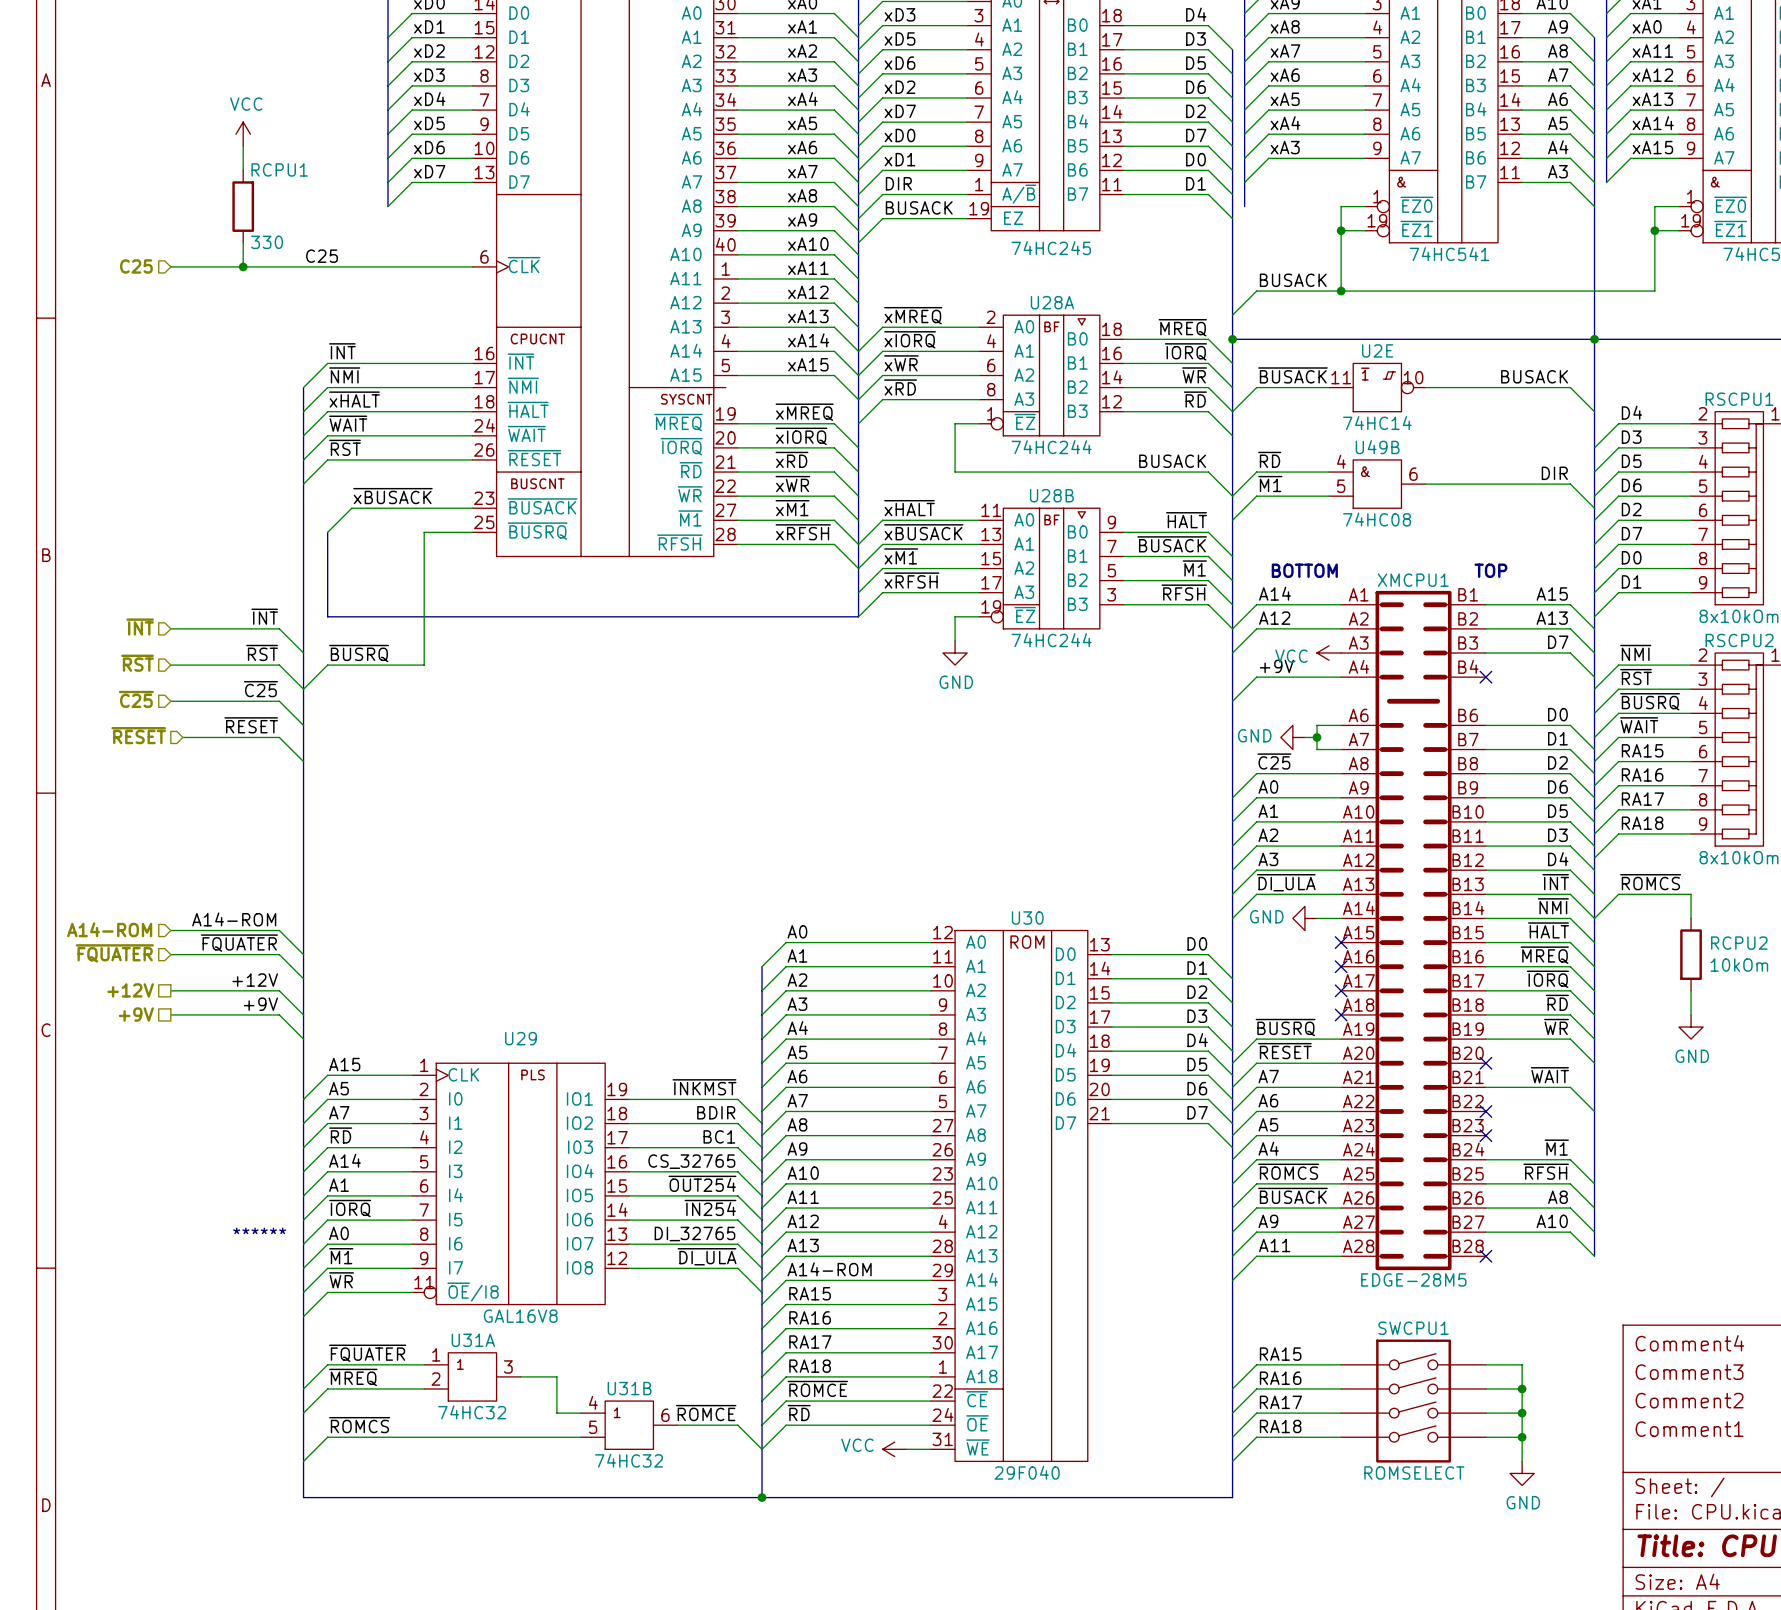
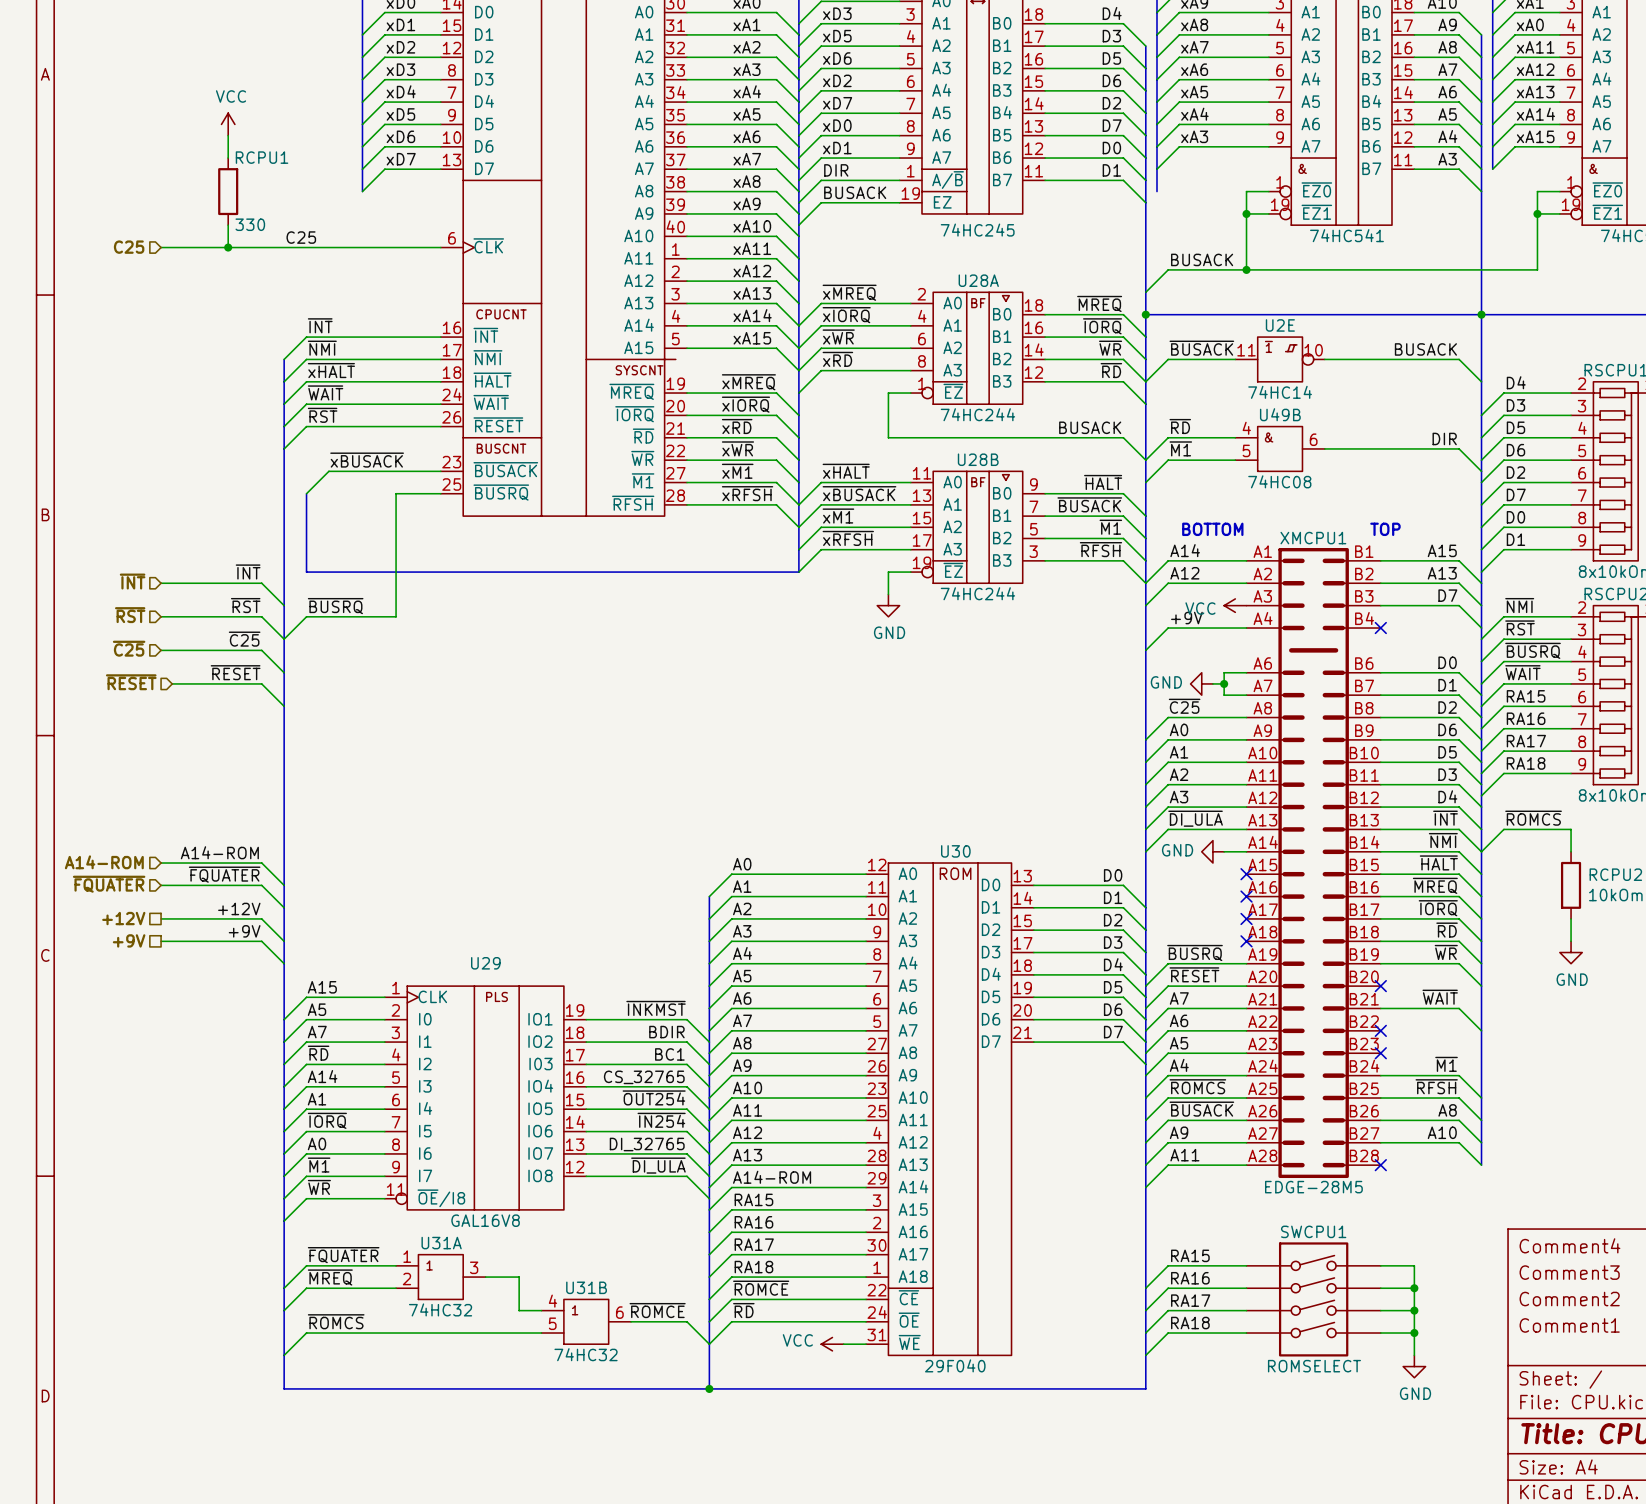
text: ****** (259, 1230) -> none

